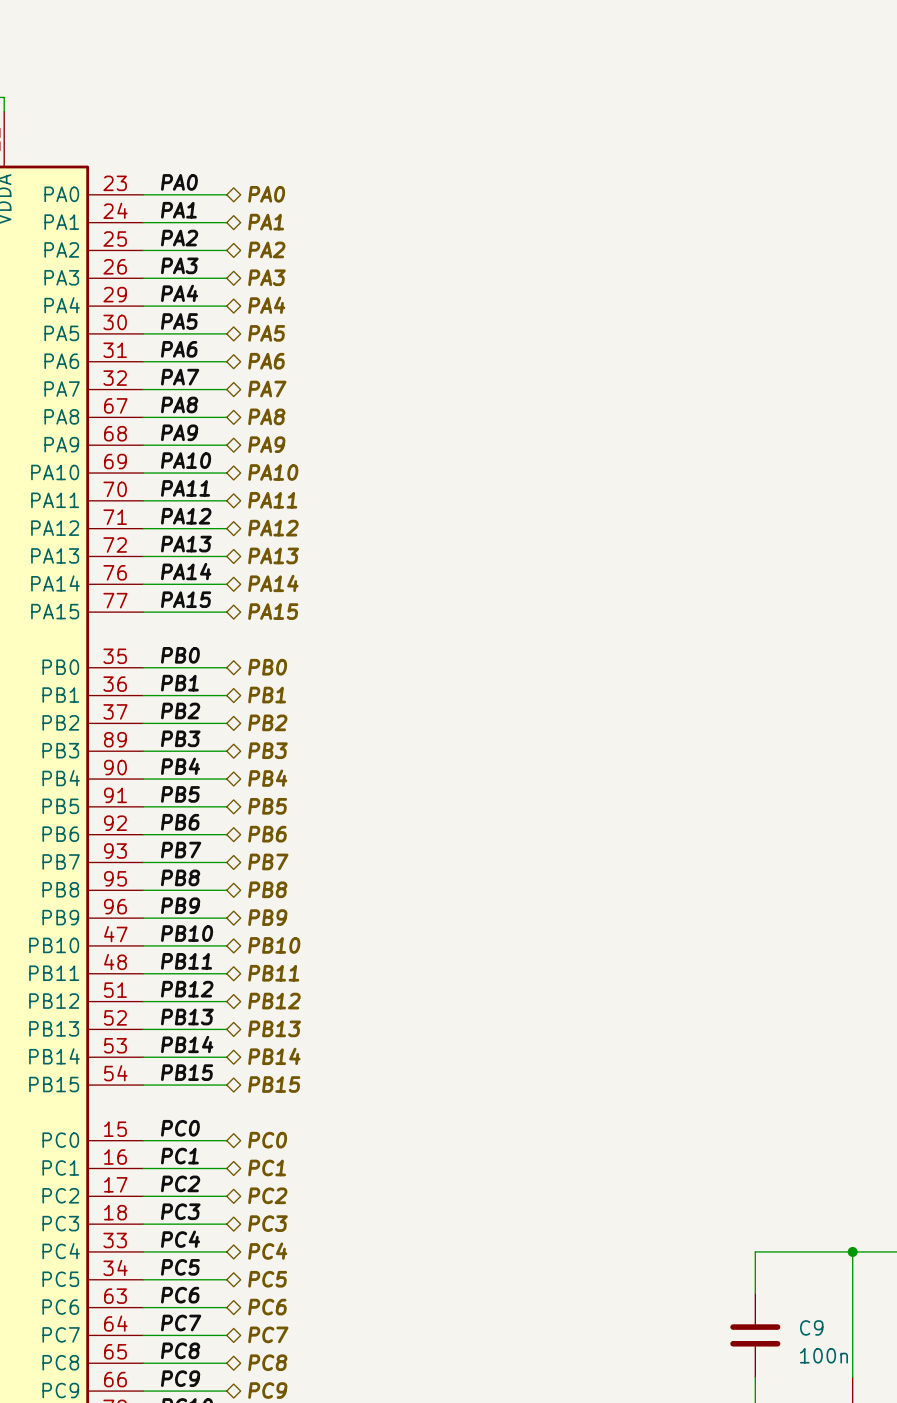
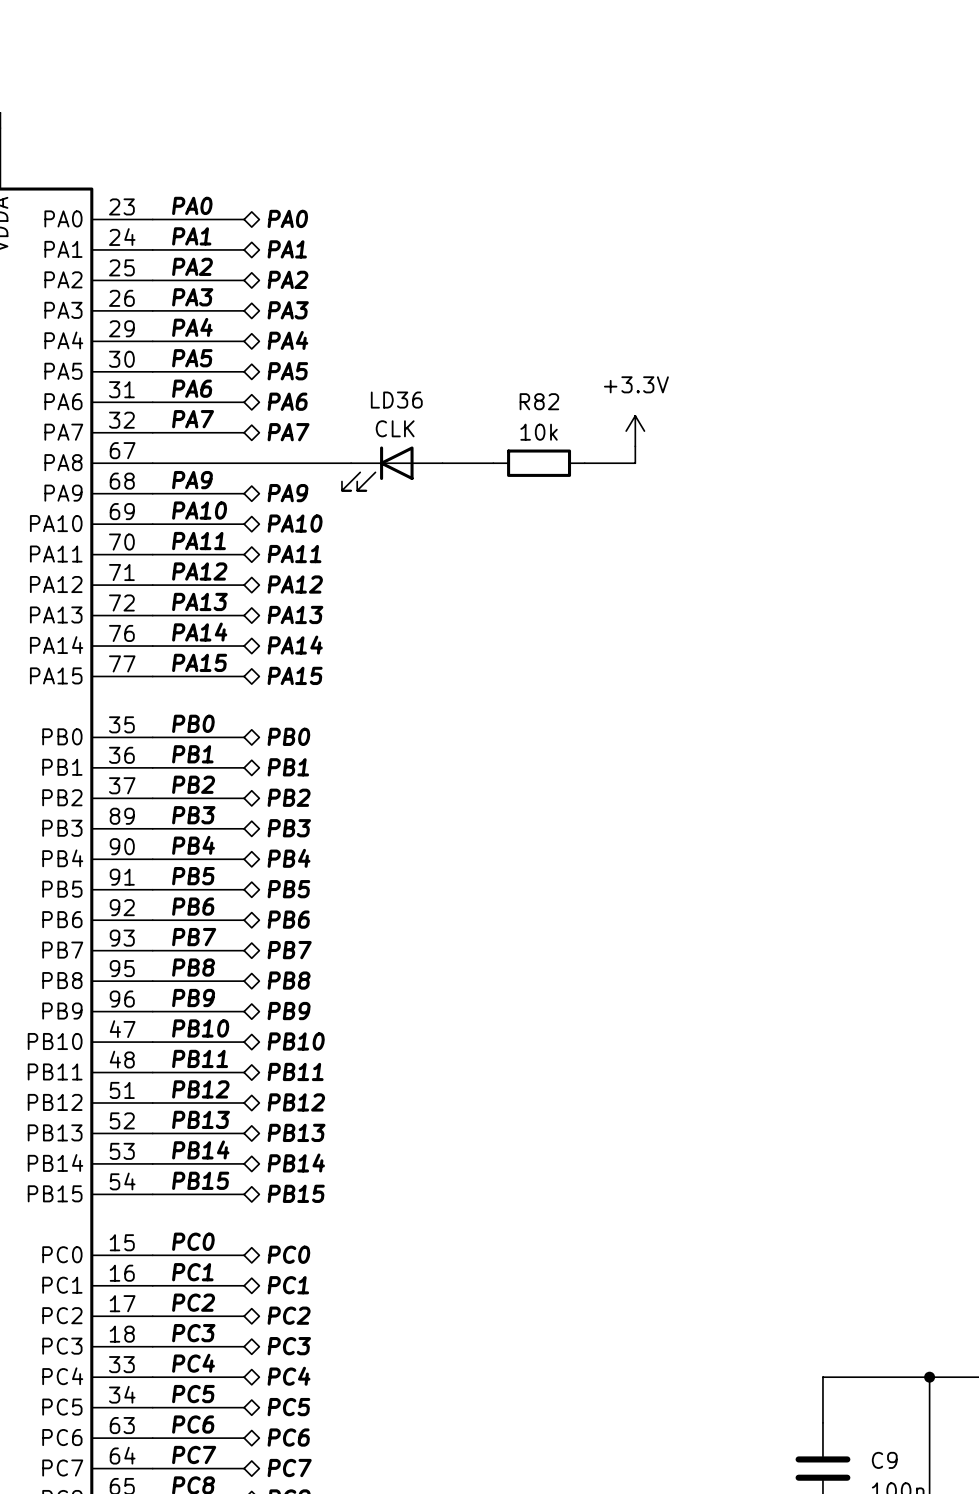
power symbol: none -> +3.3V (635, 431)
wire: none -> (635, 446) (635, 463) (584, 463)
label: PA8 (179, 404) -> none
hierarchical label: PA8 (266, 416) -> none
wire: none -> (244, 463) (351, 463)
wire: none -> (442, 463) (493, 463)
R82: none -> 10k (539, 463)
LD36: none -> CLK (392, 468)

